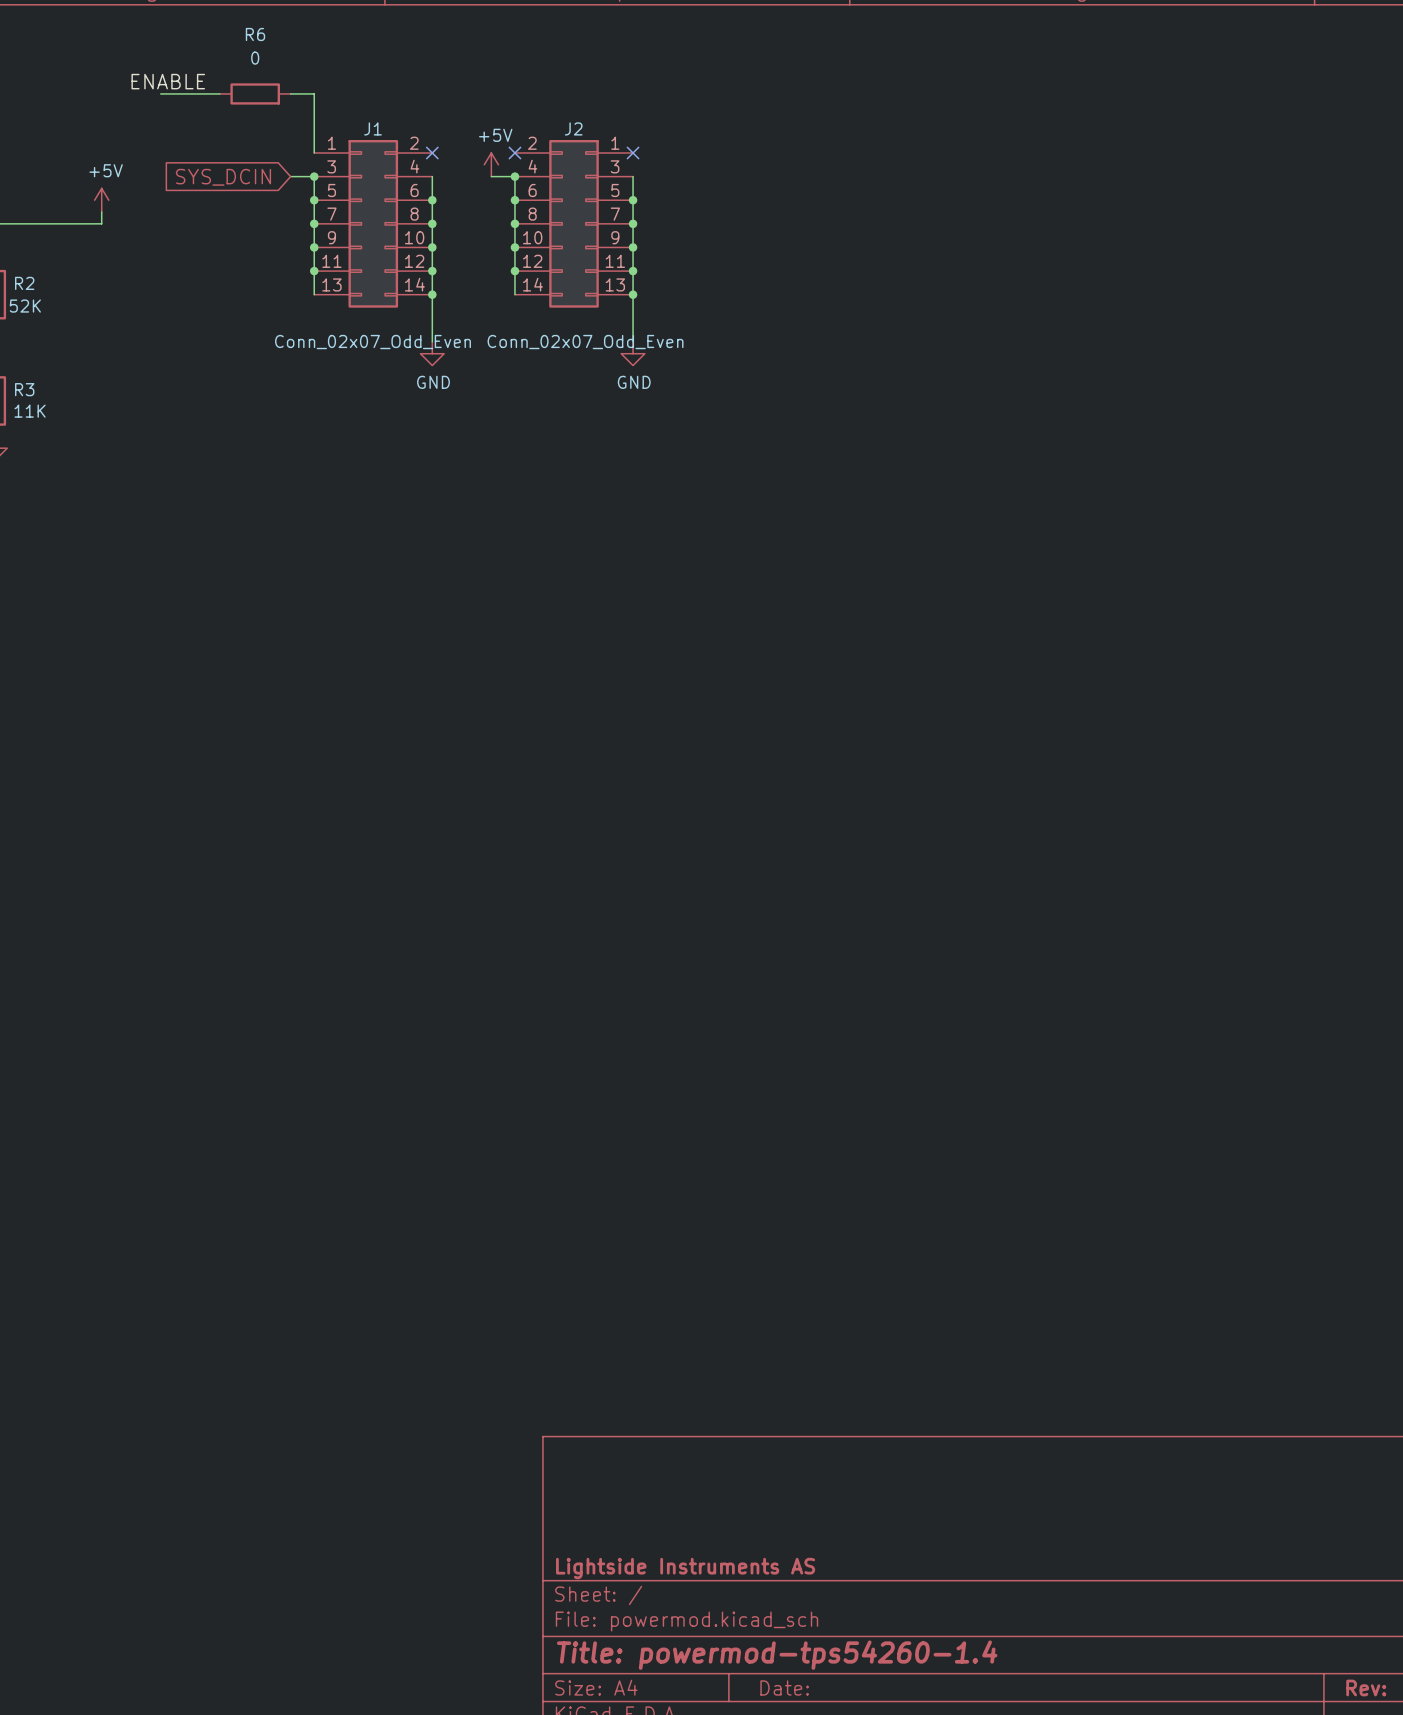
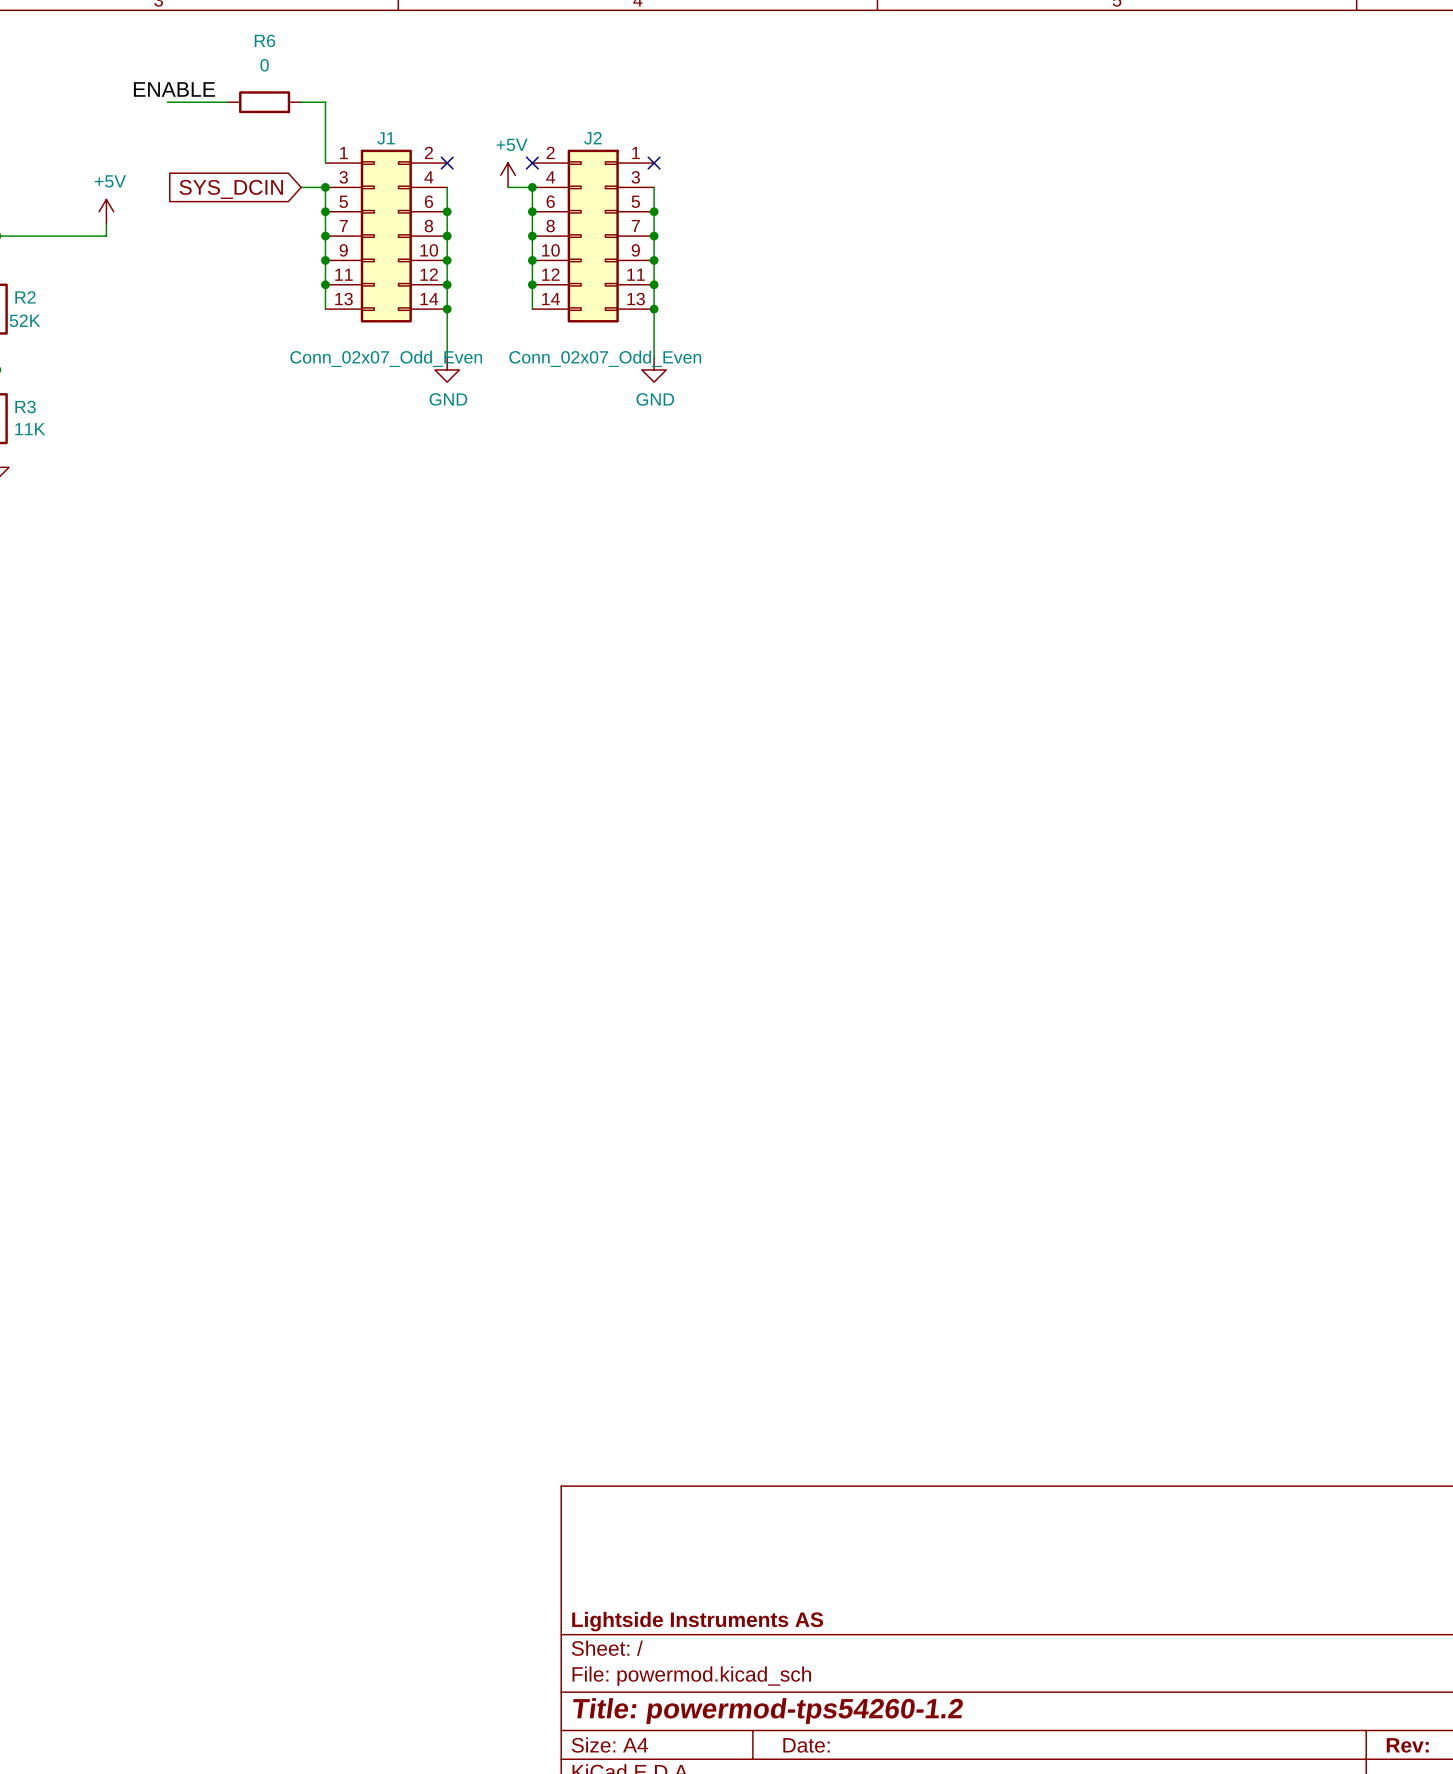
title block: Title: powermod-tps54260-1.4 (777, 1655) -> Title: powermod-tps54260-1.2 (768, 1711)

